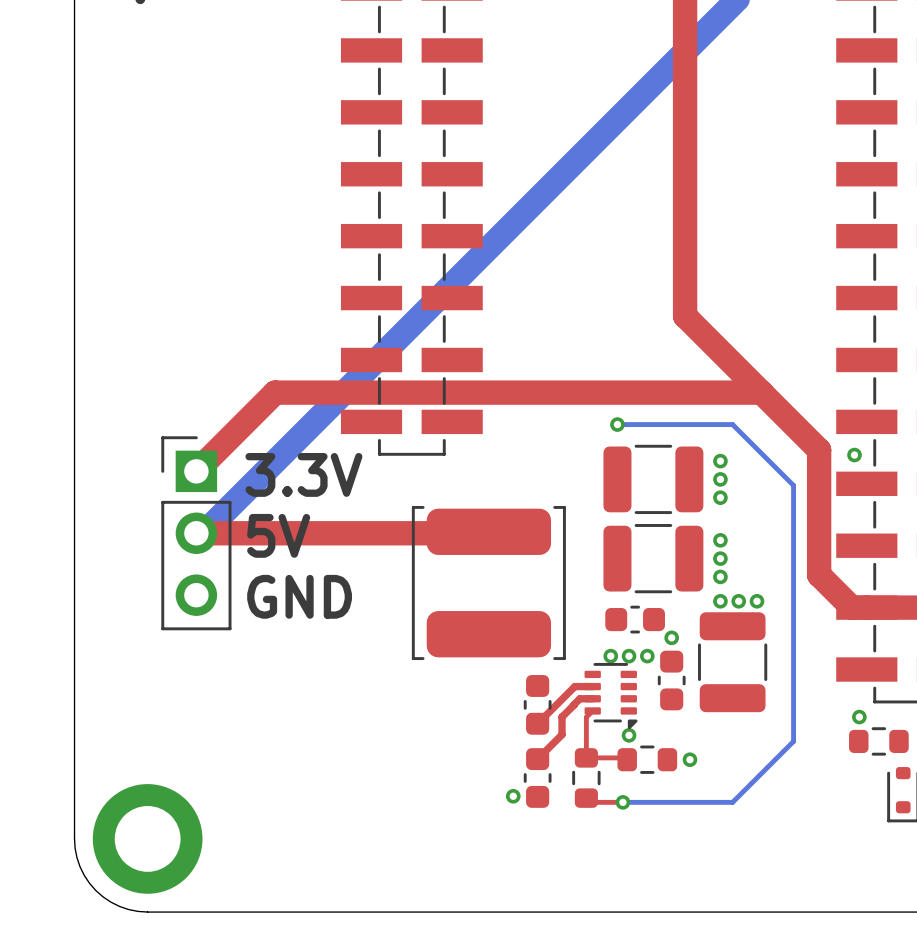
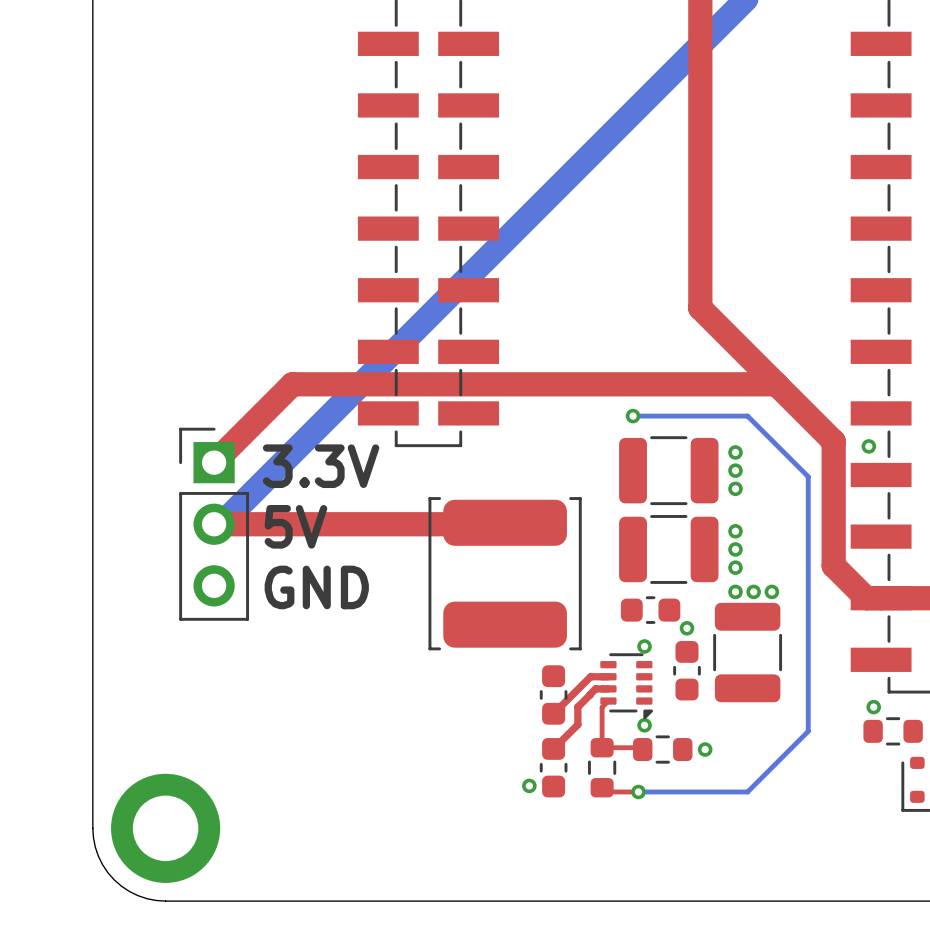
via: (610, 656) -> none
via: (647, 656) -> none

